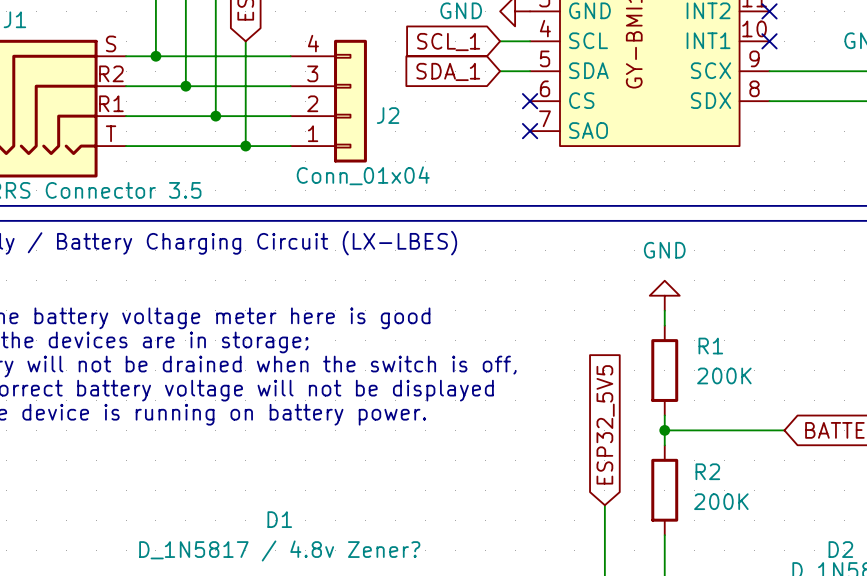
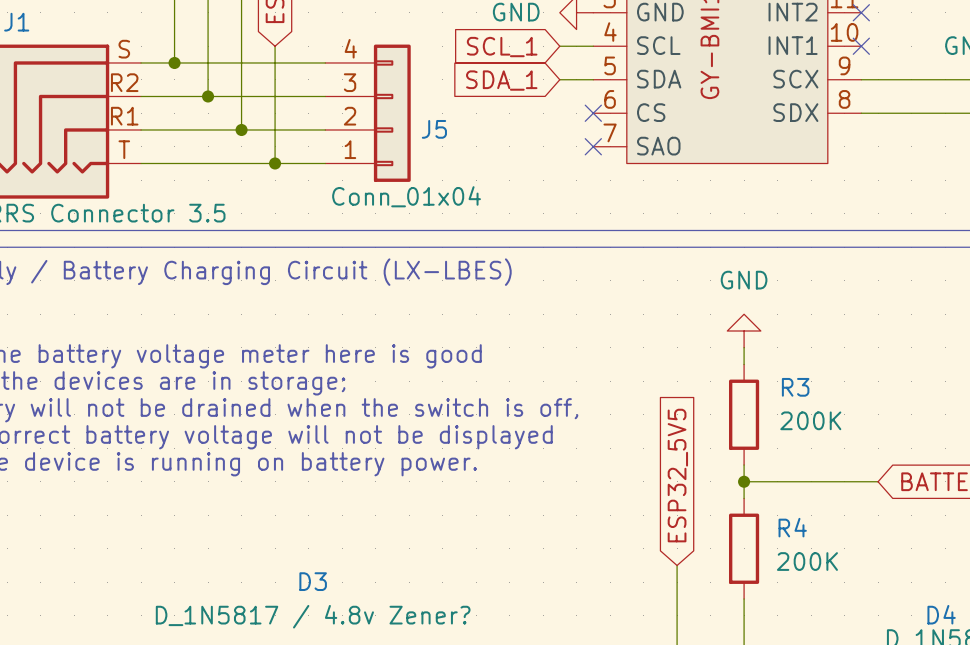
J2 name: J2 (388, 115) -> J5 (434, 129)
R1 name: R1 (710, 346) -> R3 (795, 387)
R2 name: R2 (707, 471) -> R4 (792, 527)
D1 name: D1 (279, 519) -> D3 (313, 581)
D2 name: D2 (840, 549) -> D4 (941, 614)

